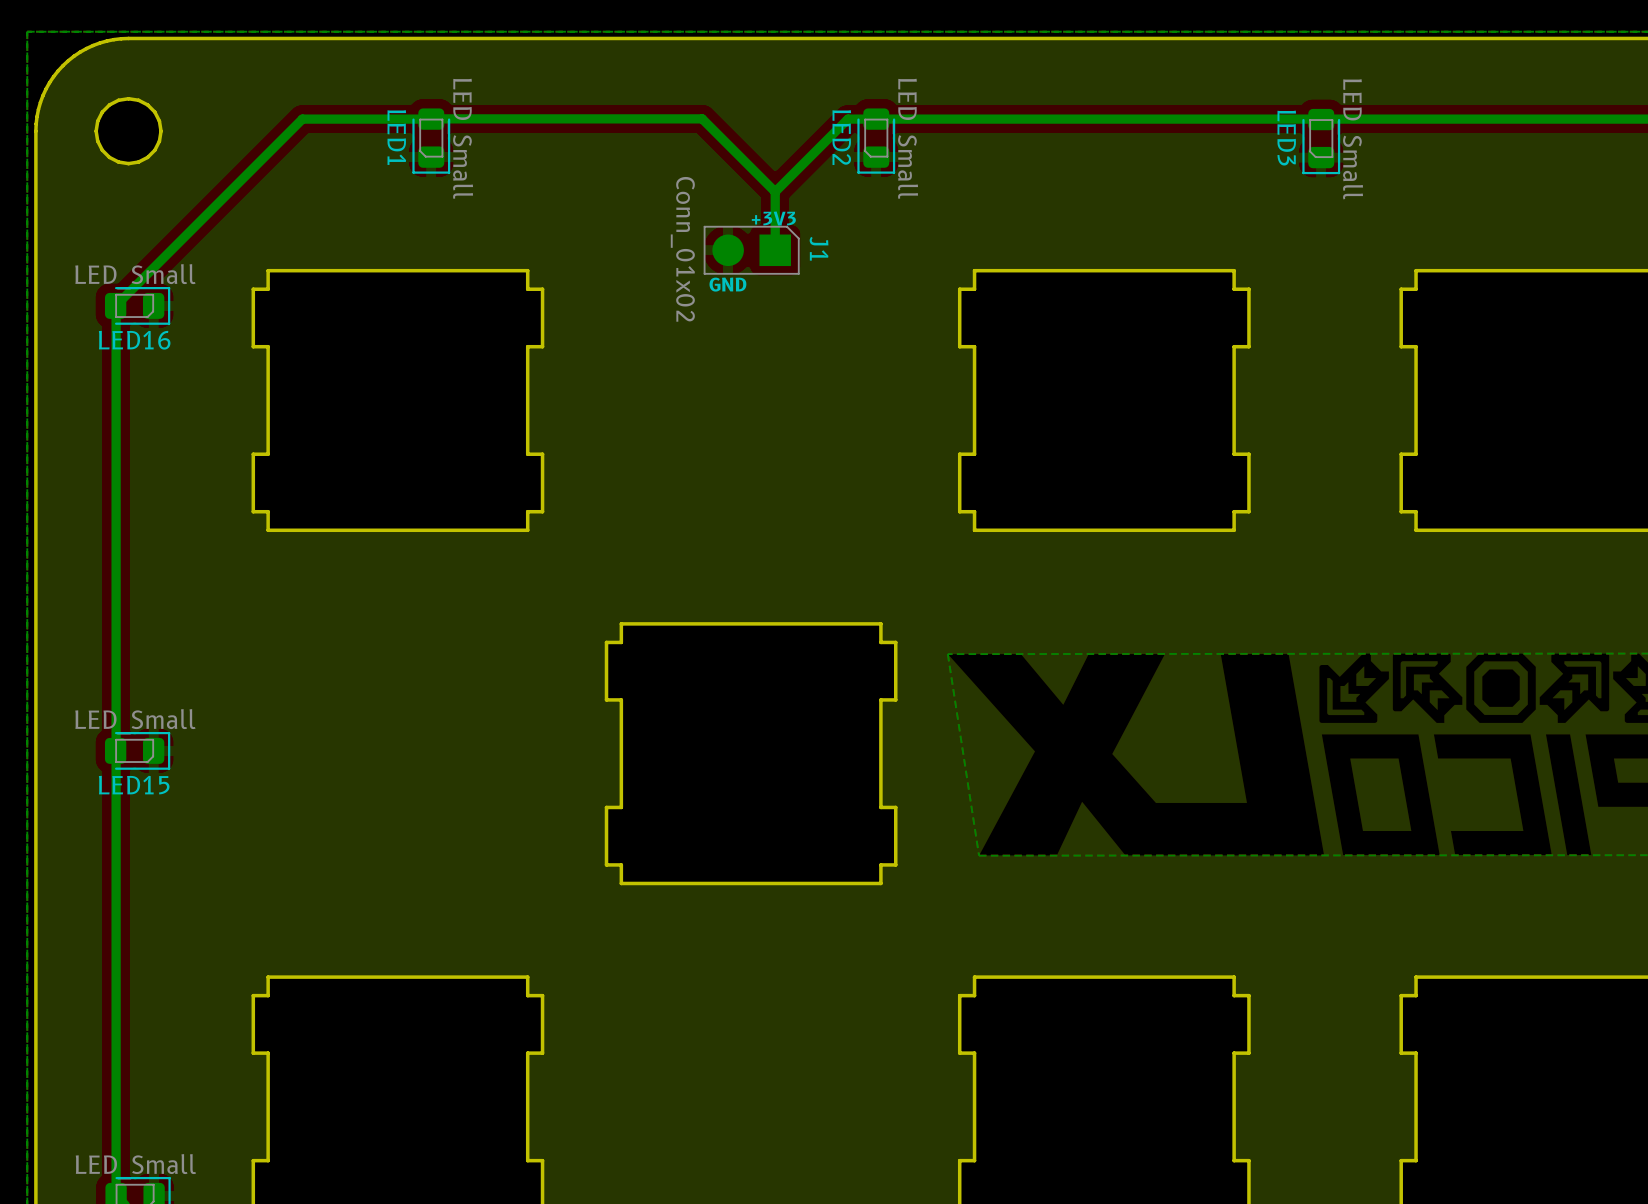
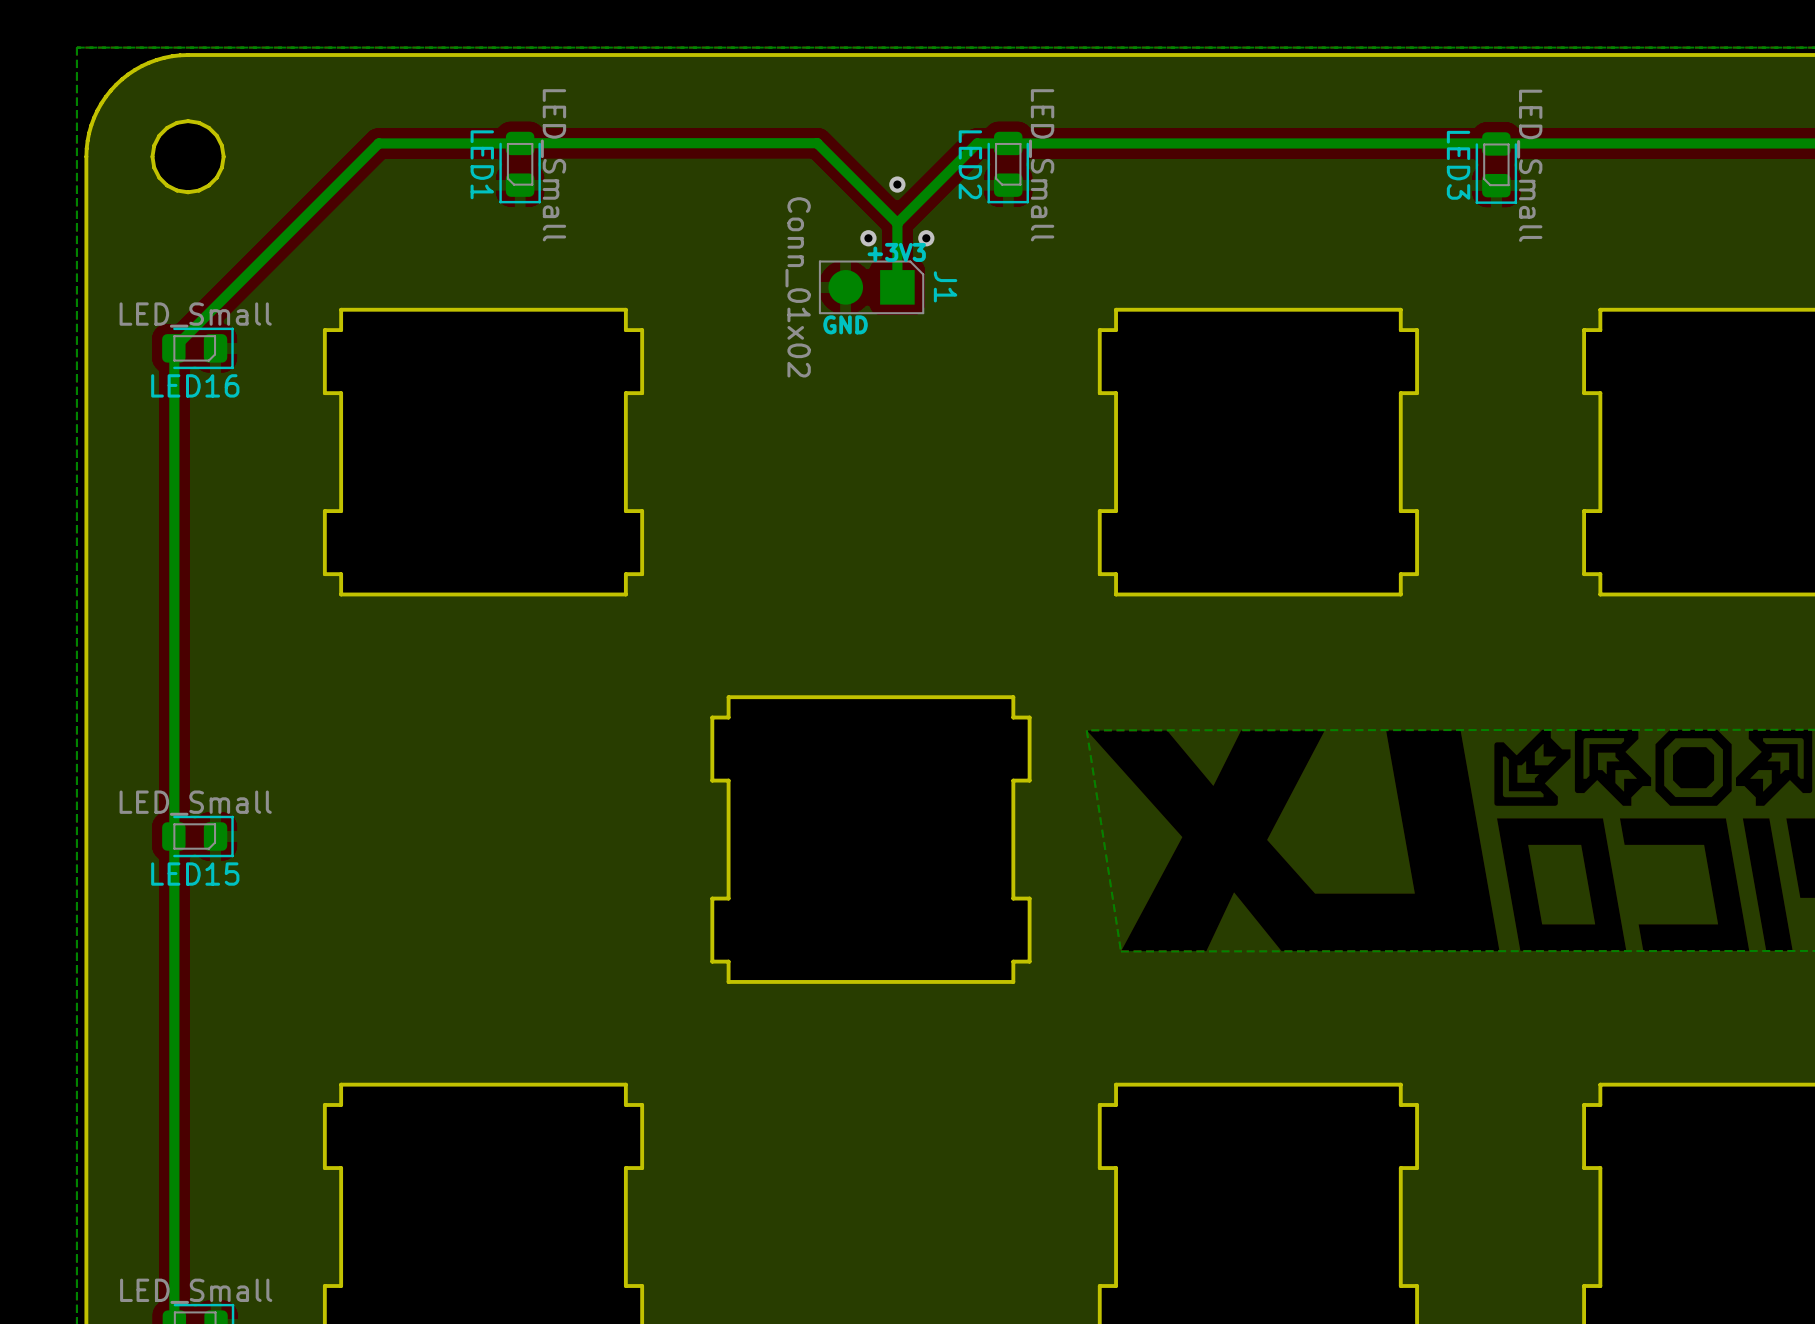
via: none -> (897, 184)
via: none -> (868, 238)
via: none -> (926, 238)

